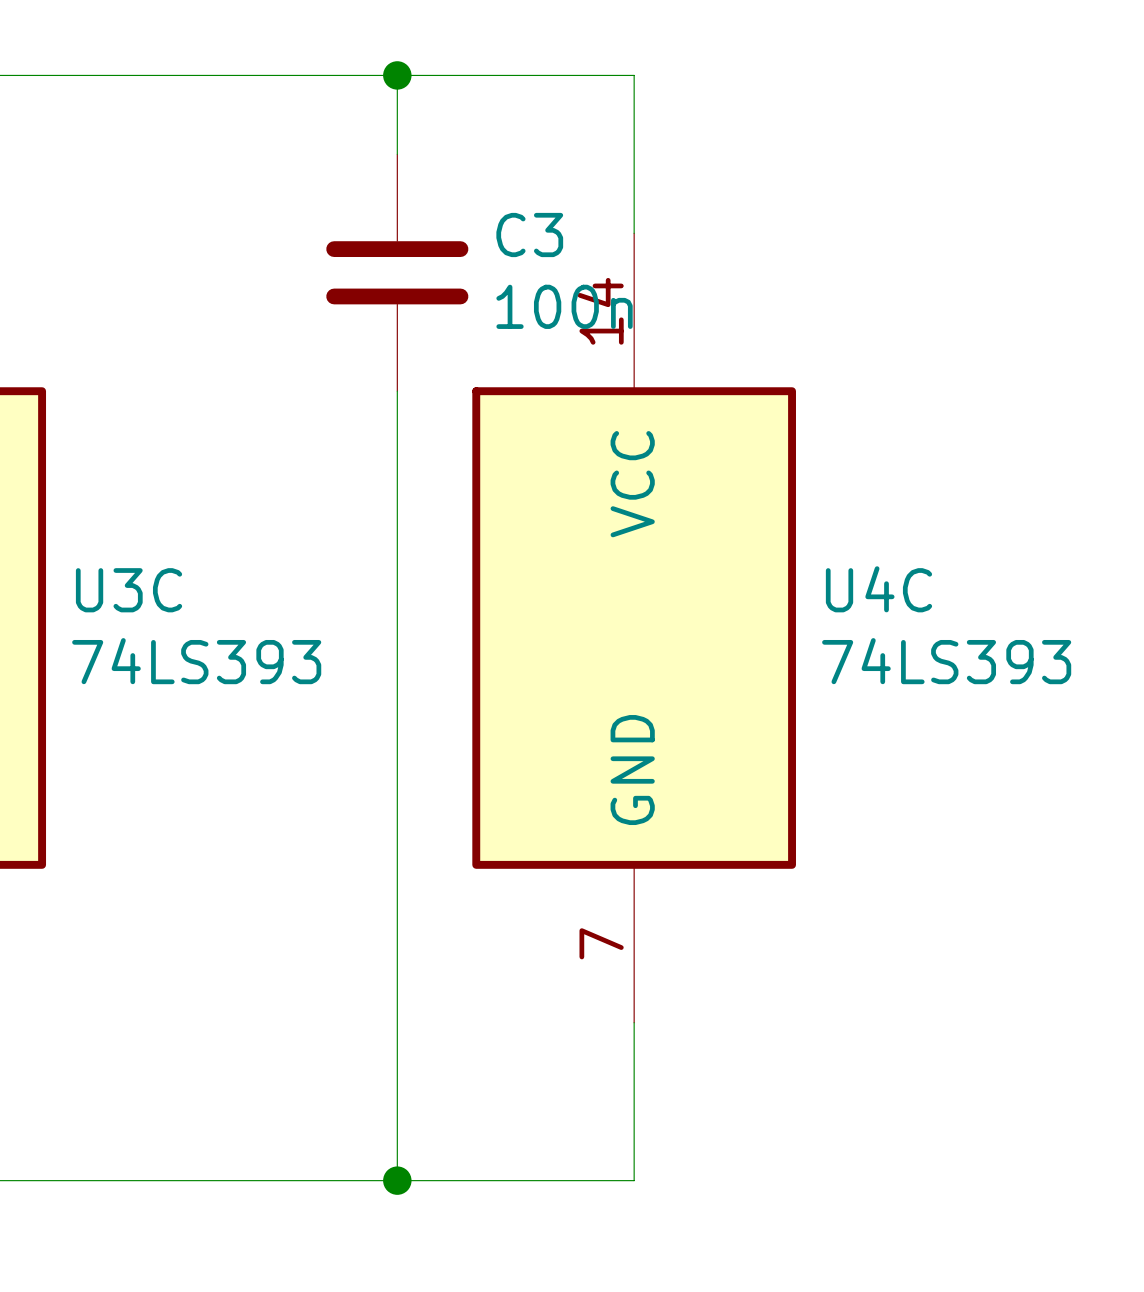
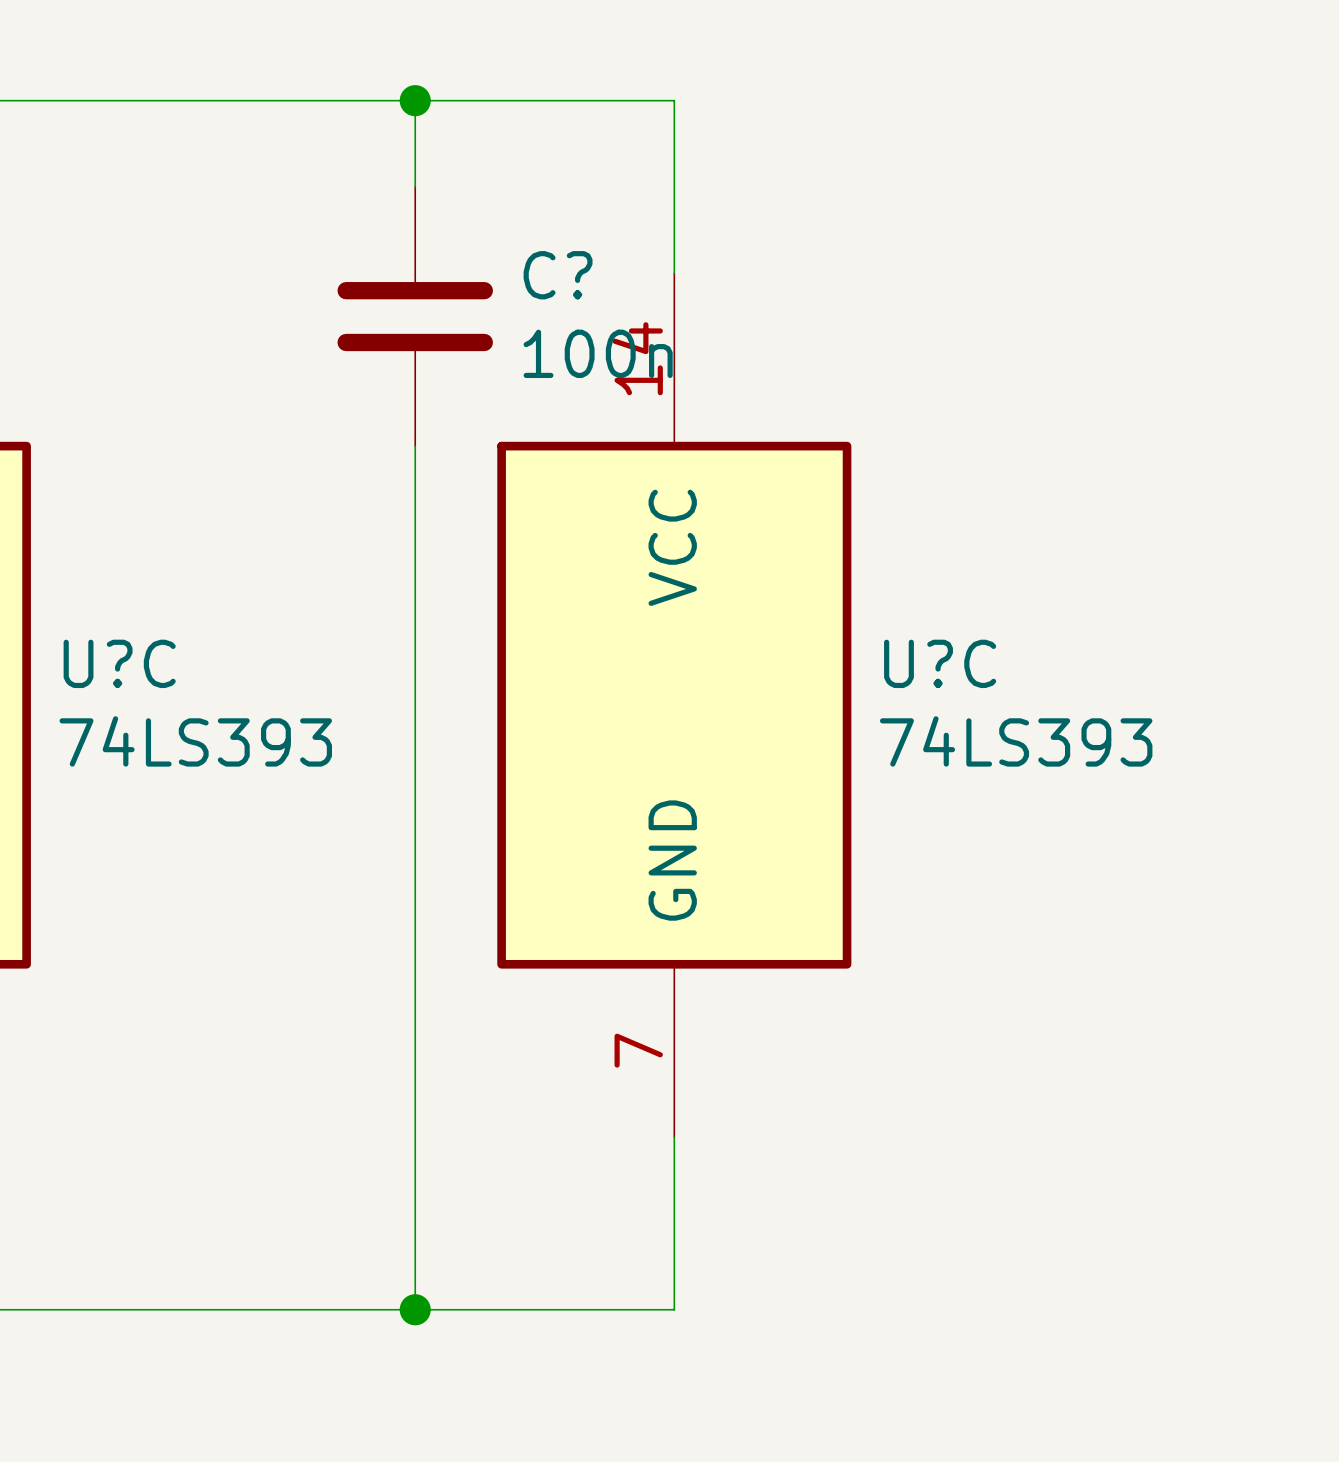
C3 name: C3 (529, 235) -> C? (558, 275)
U4C name: U4C (878, 589) -> U?C (940, 663)
U3C name: U3C (129, 590) -> U?C (119, 663)

